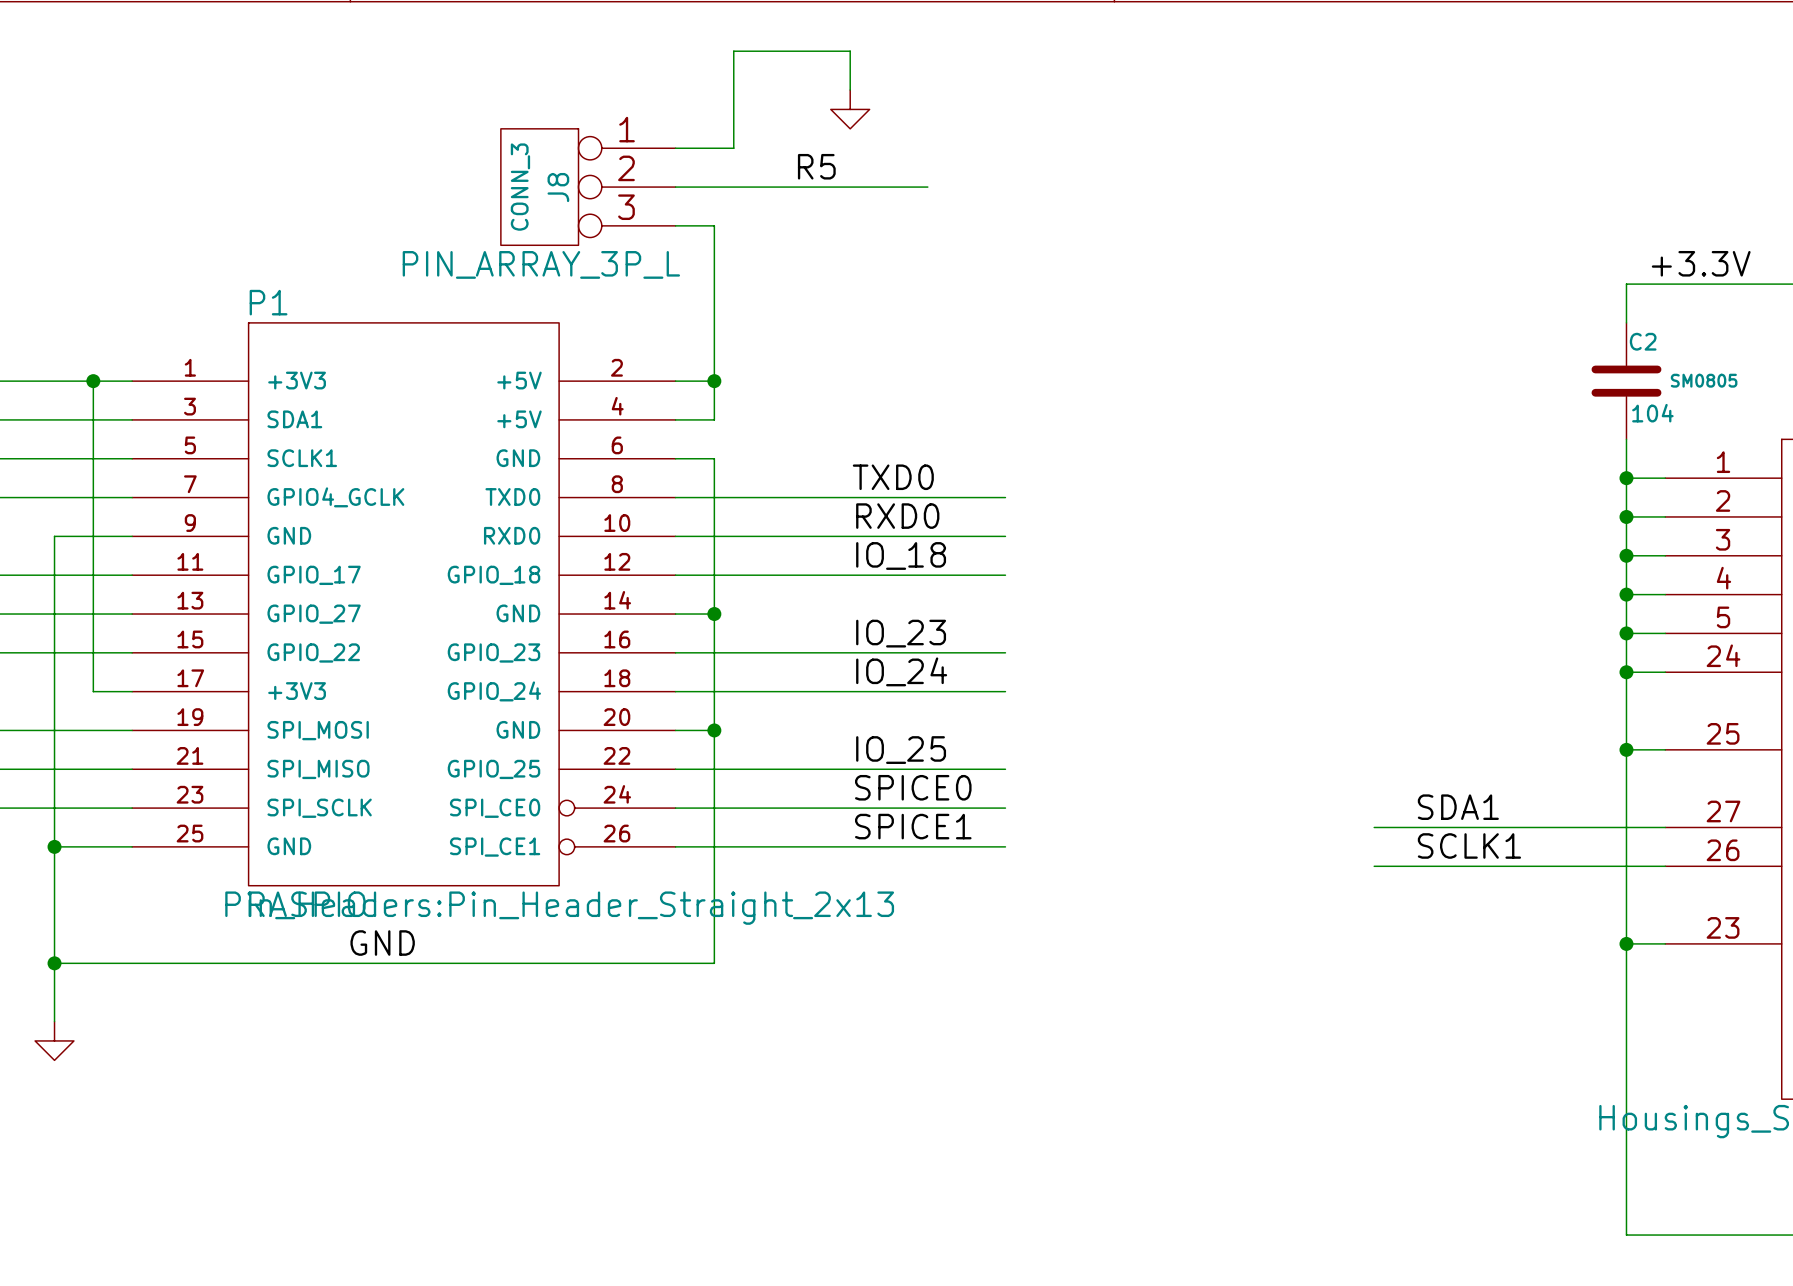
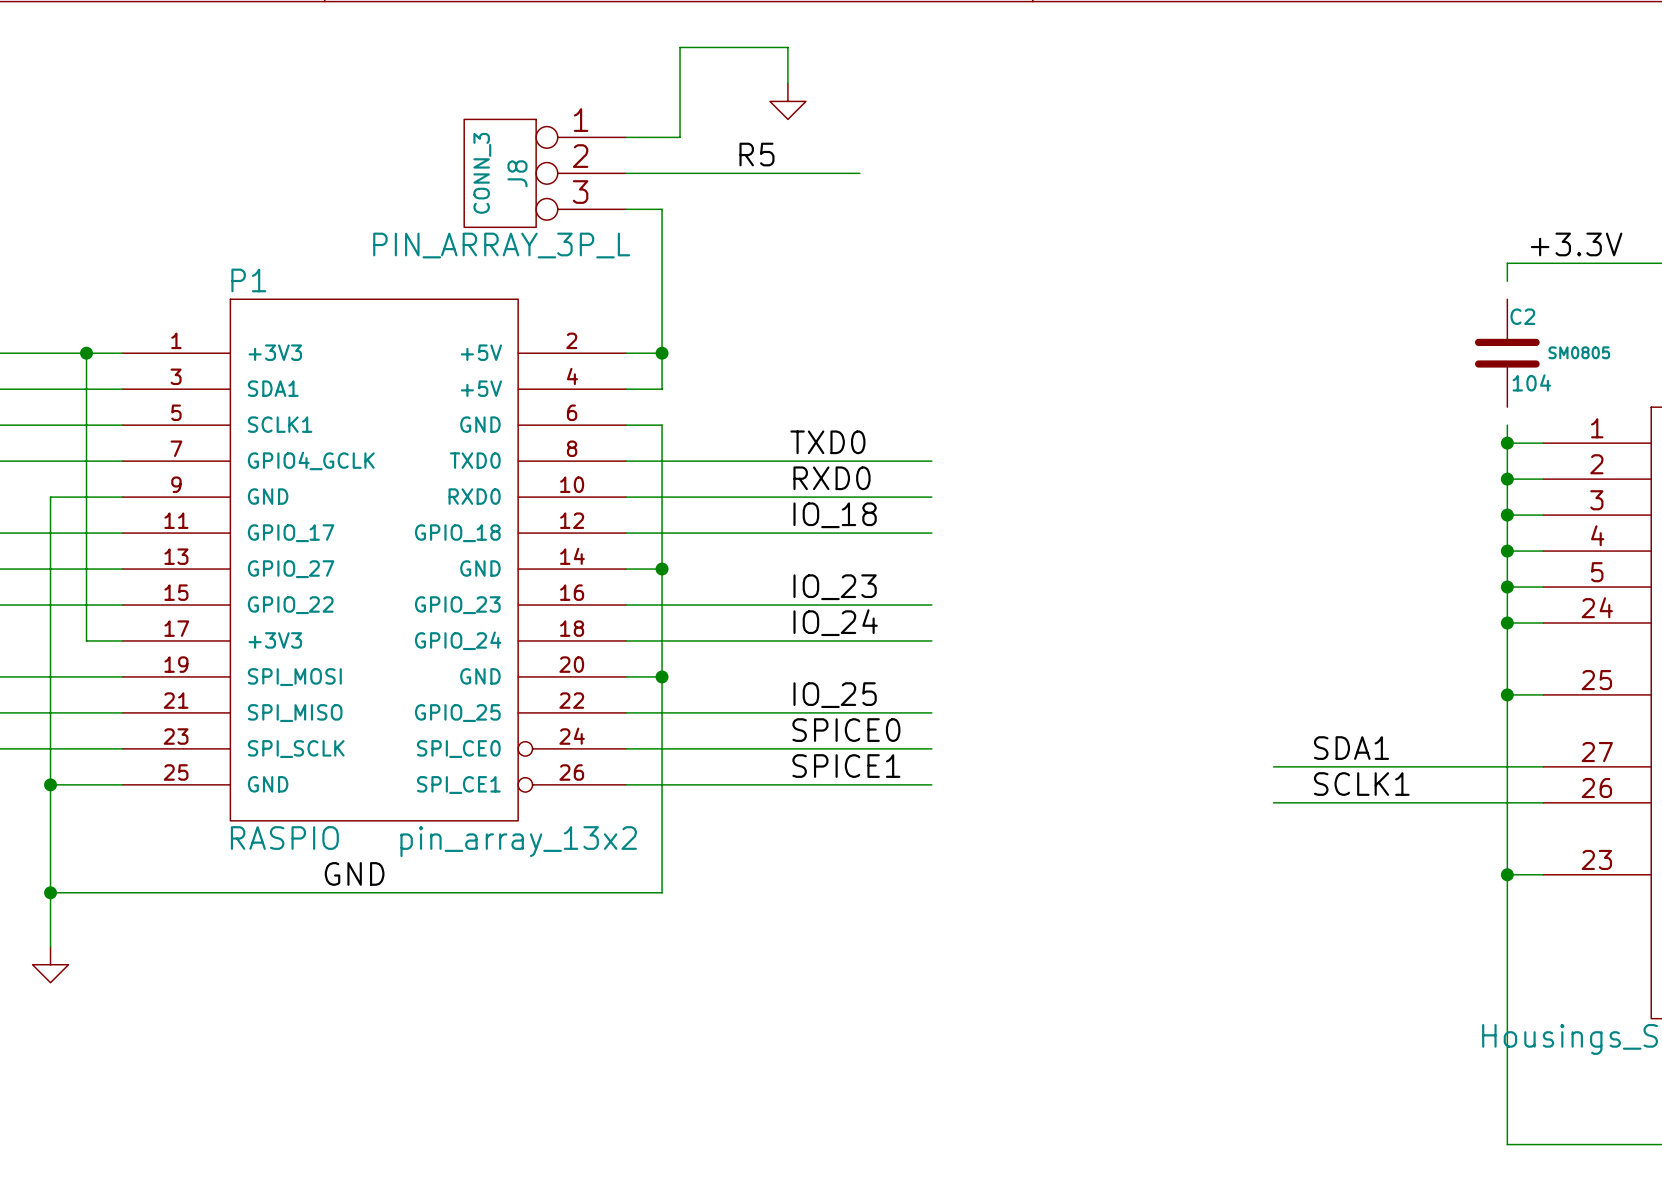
wire: (1626, 303) (1626, 322) -> none
wire: (1626, 439) (1626, 458) -> none
P1 text: Pin_Headers:Pin_Header_Straight_2x13 (559, 908) -> pin_array_13x2 (518, 841)

